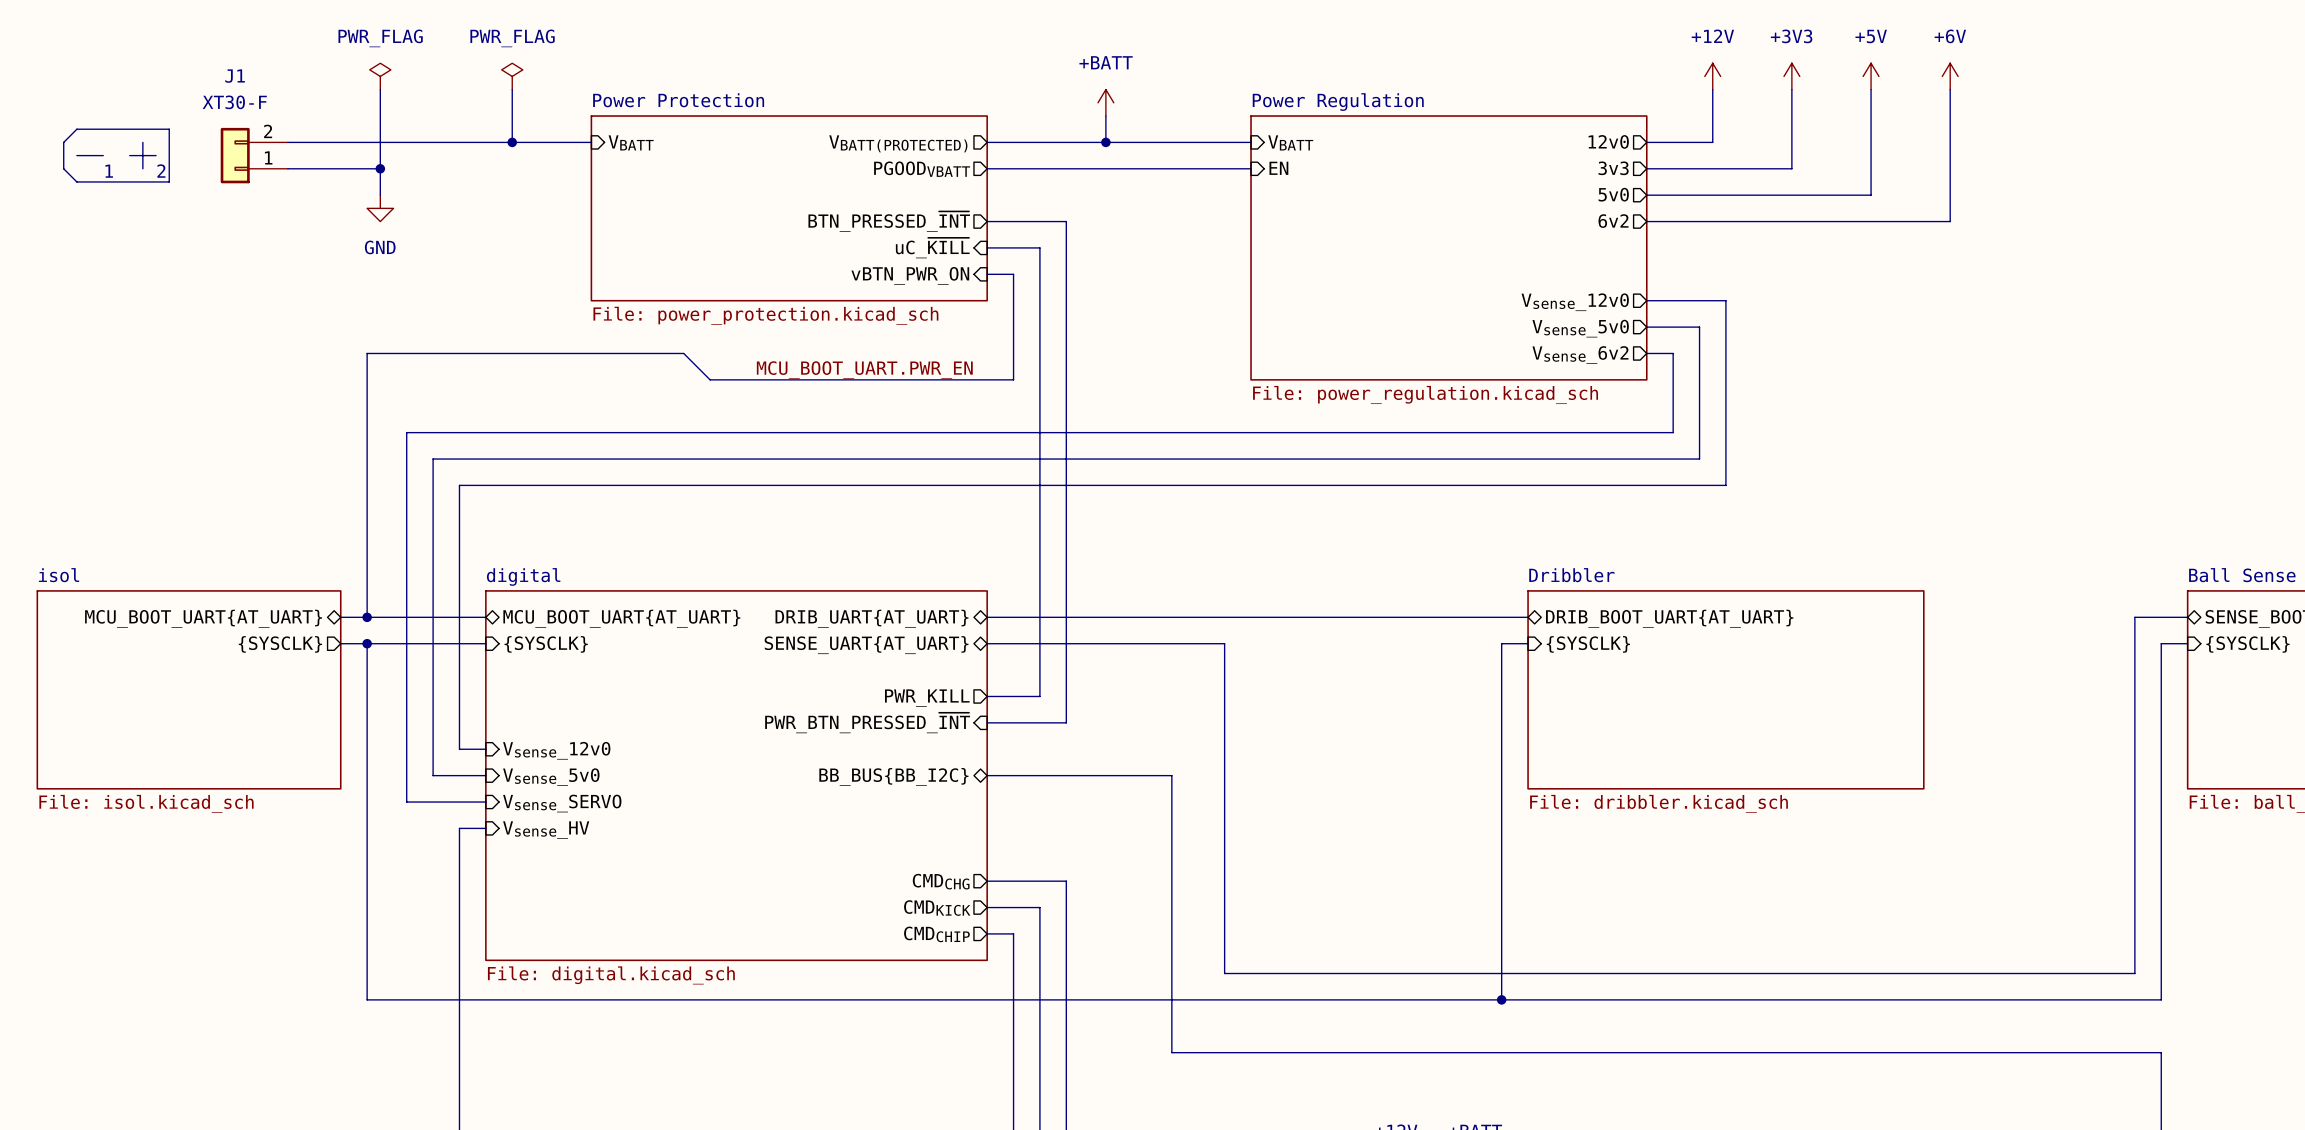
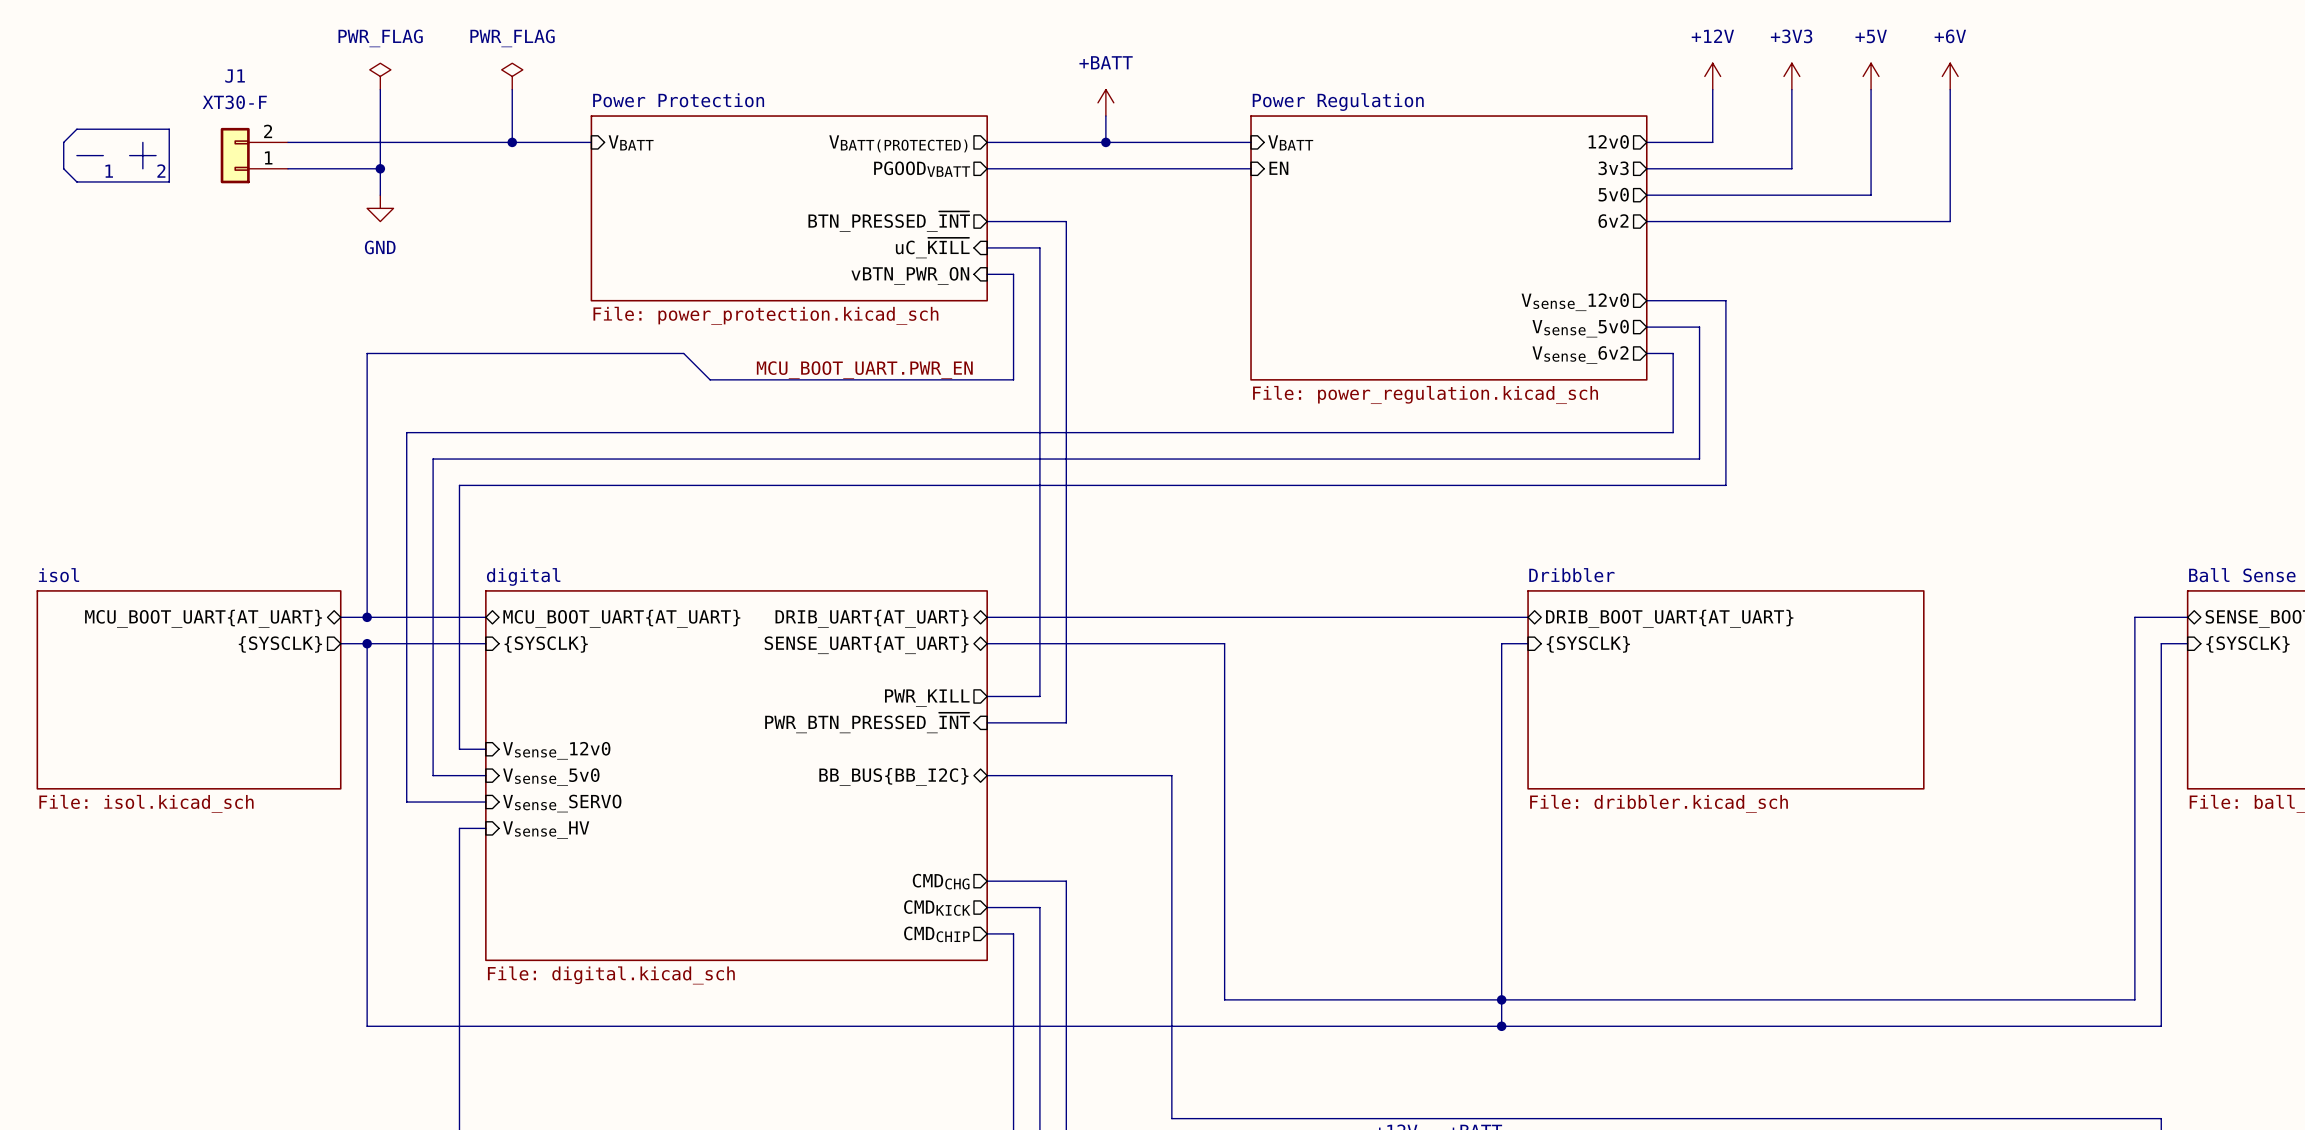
bus: (1224, 973) (2134, 973) -> none
bus: (367, 999) (1224, 999) -> (1224, 973) (1224, 999)
bus: none -> (367, 999) (367, 1026) (2161, 1026) (2161, 999)
bus: none -> (1501, 999) (1501, 1026)
bus: (2134, 999) (2161, 999) -> (2134, 999) (2134, 973)
junction: none -> (1501, 1026)
bus: (1171, 1052) (2161, 1052) (2161, 1118) -> (1171, 1052) (1171, 1118) (2161, 1118)

